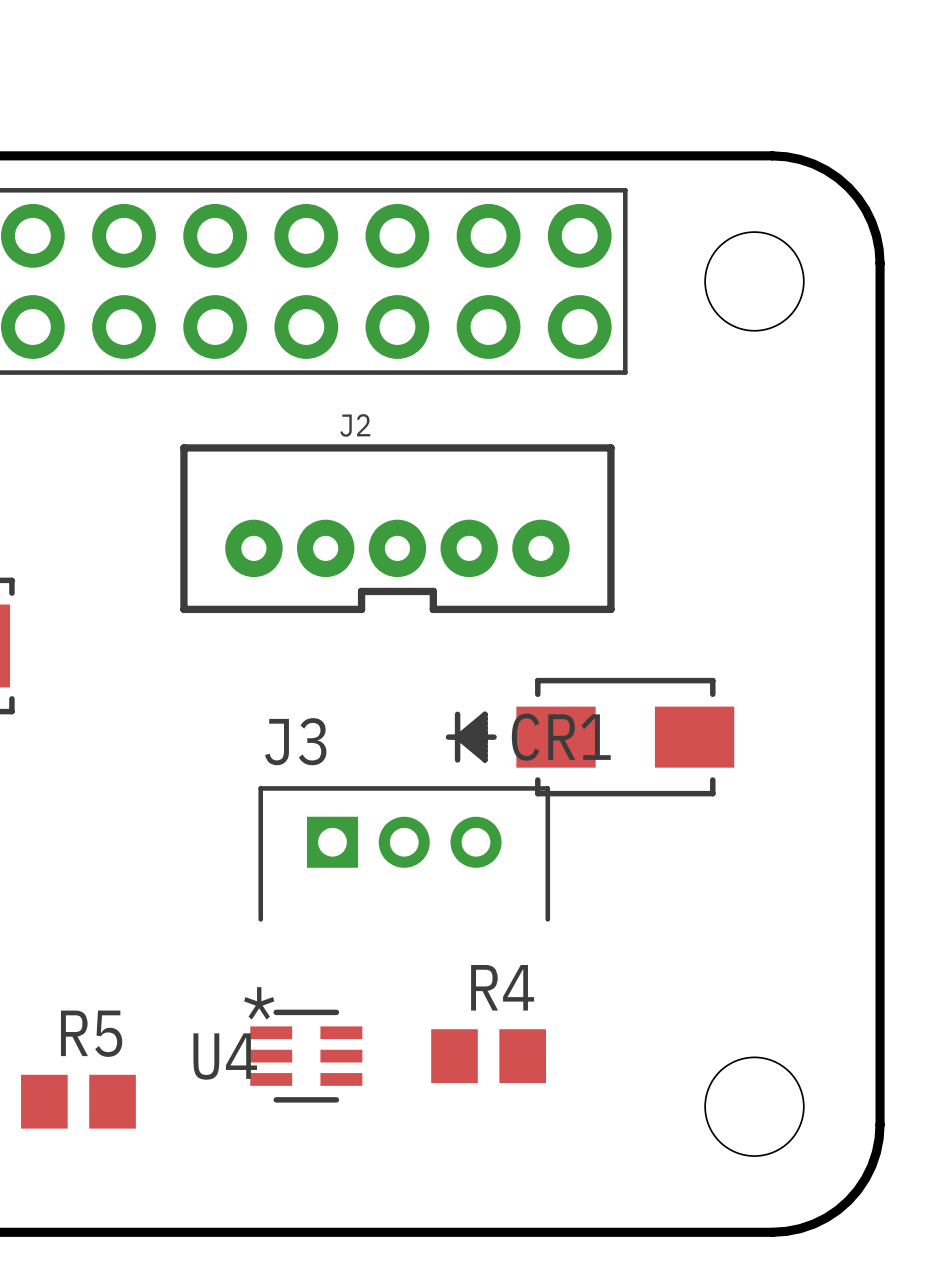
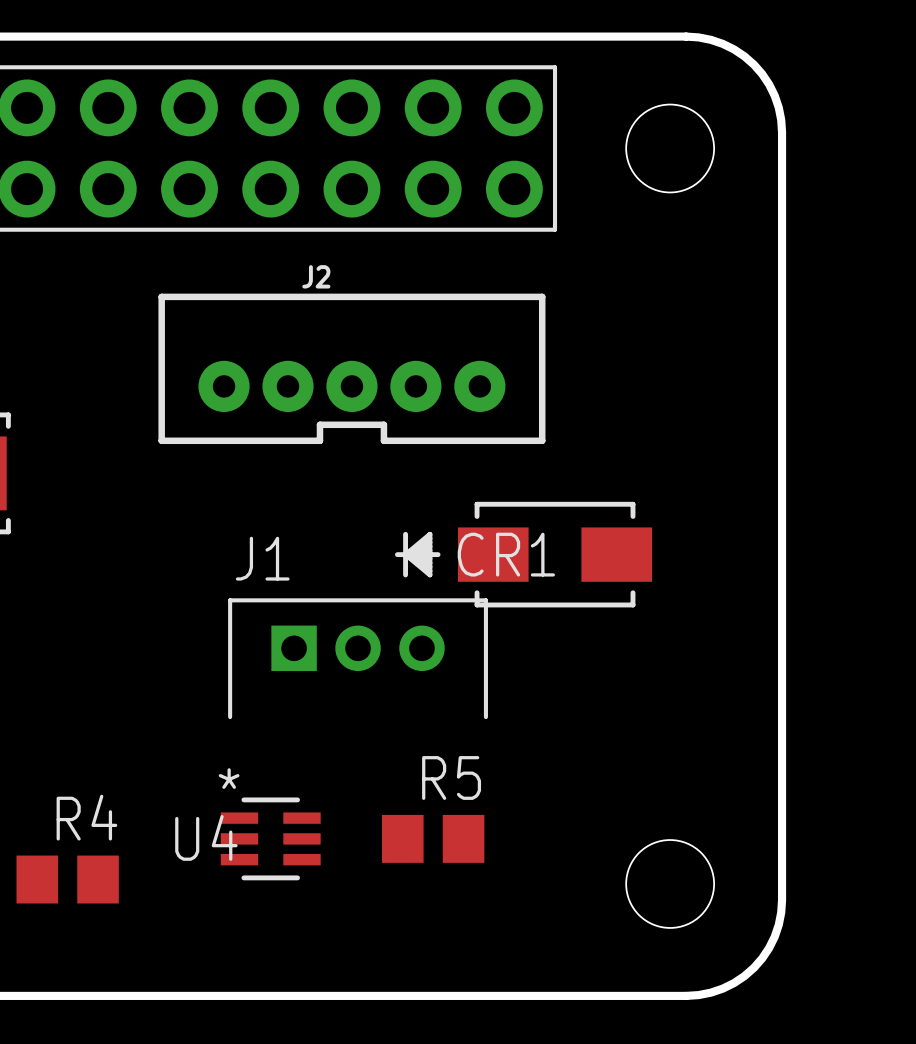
J3 name: J3 (295, 741) -> J1 (262, 558)
R4 name: R4 (502, 987) -> R5 (451, 777)
R5 name: R5 (91, 1033) -> R4 (86, 817)

